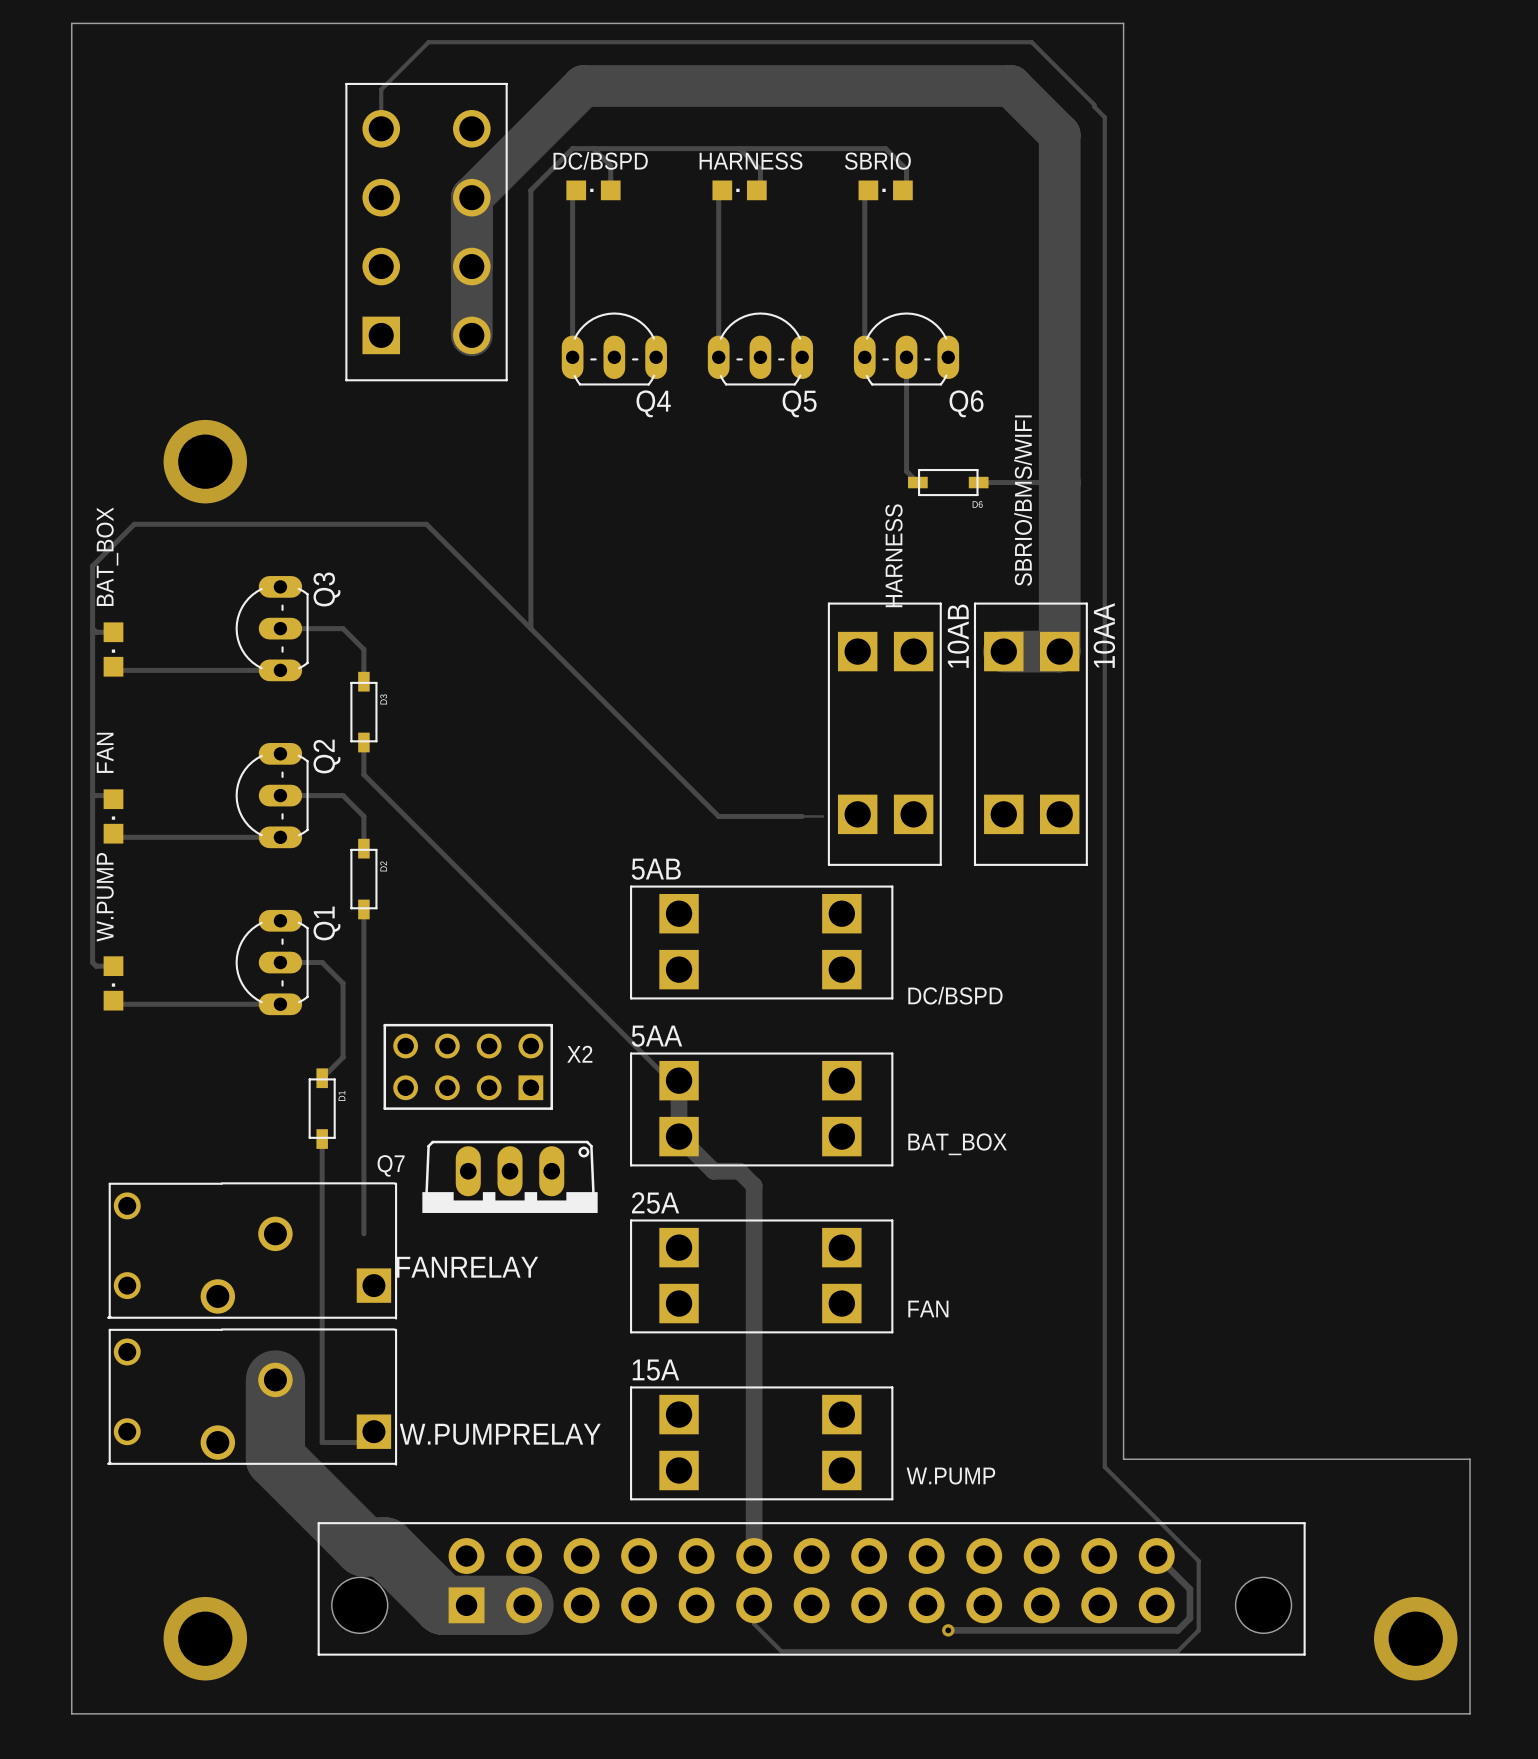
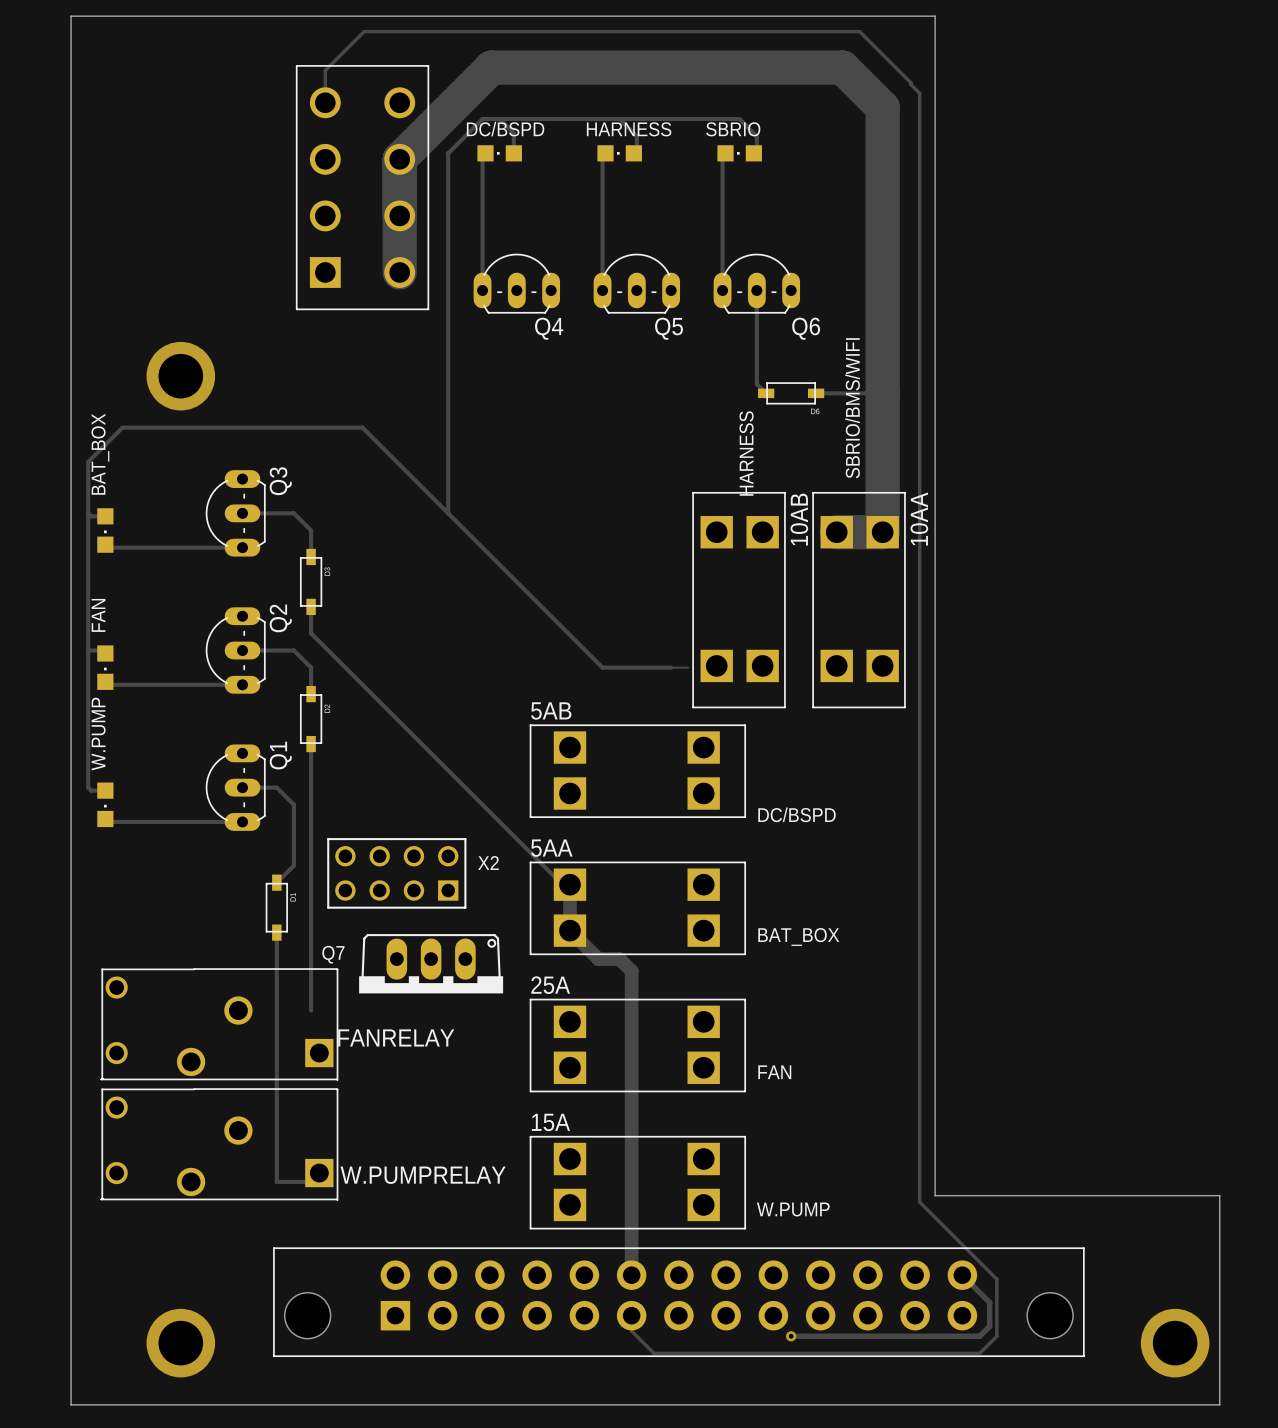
track: (275, 1379) (275, 1458) (363, 1546) (384, 1546) (443, 1605) (524, 1605) -> none

